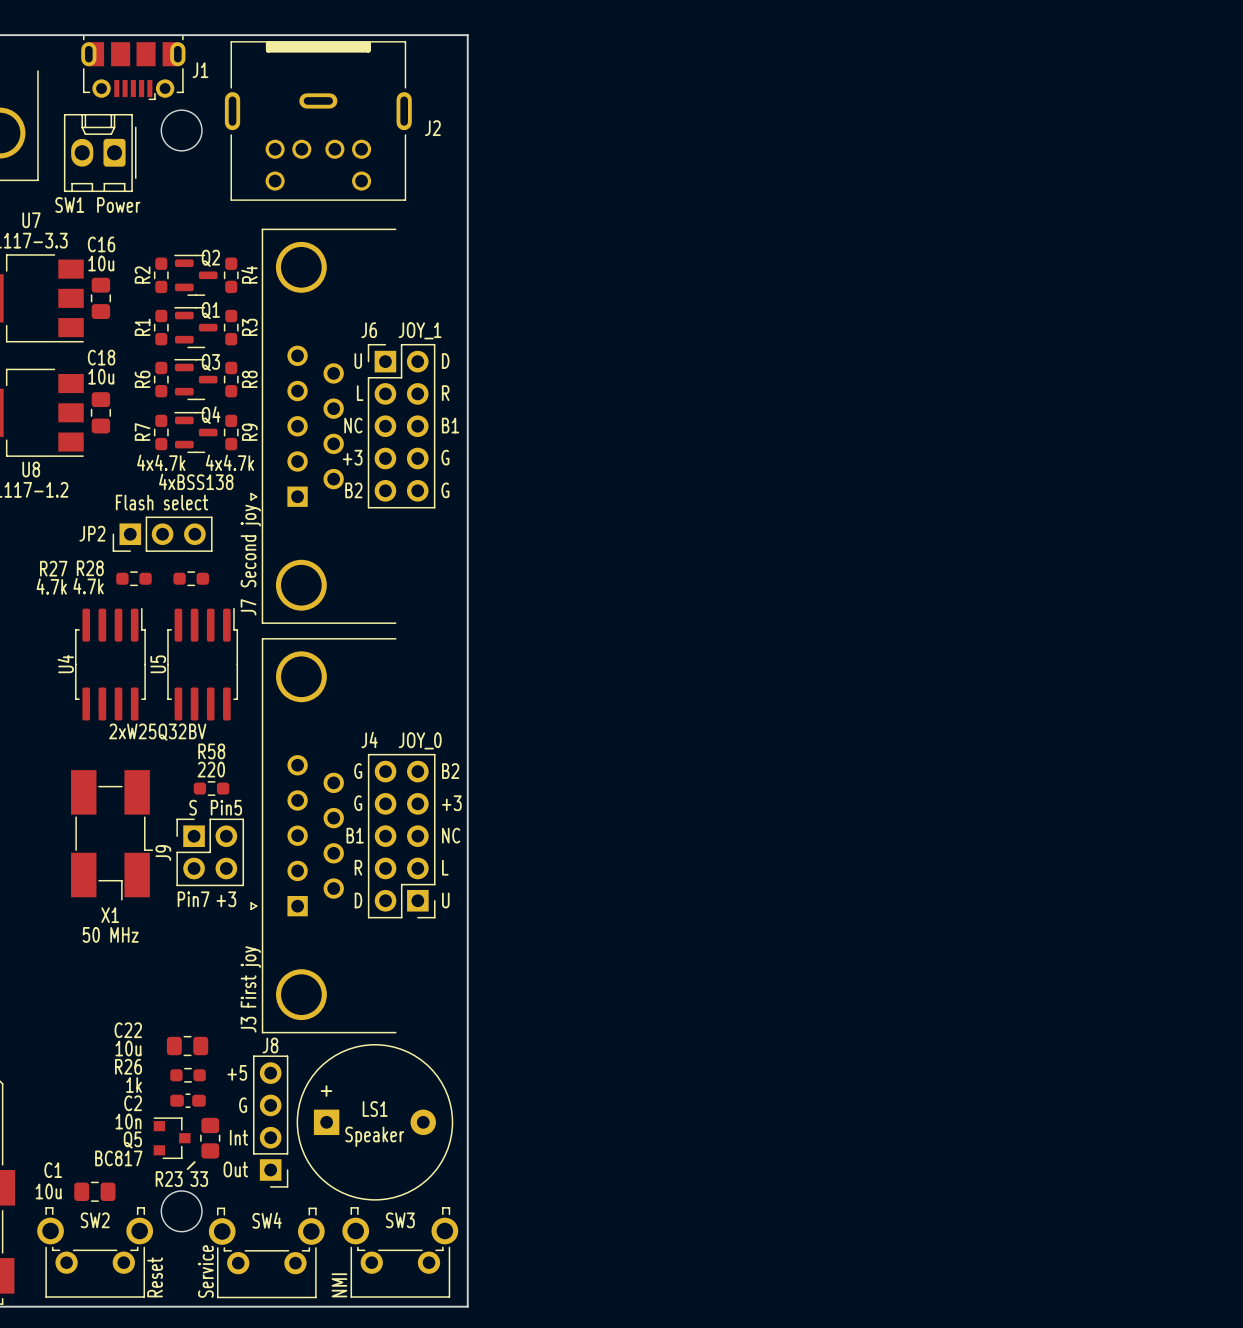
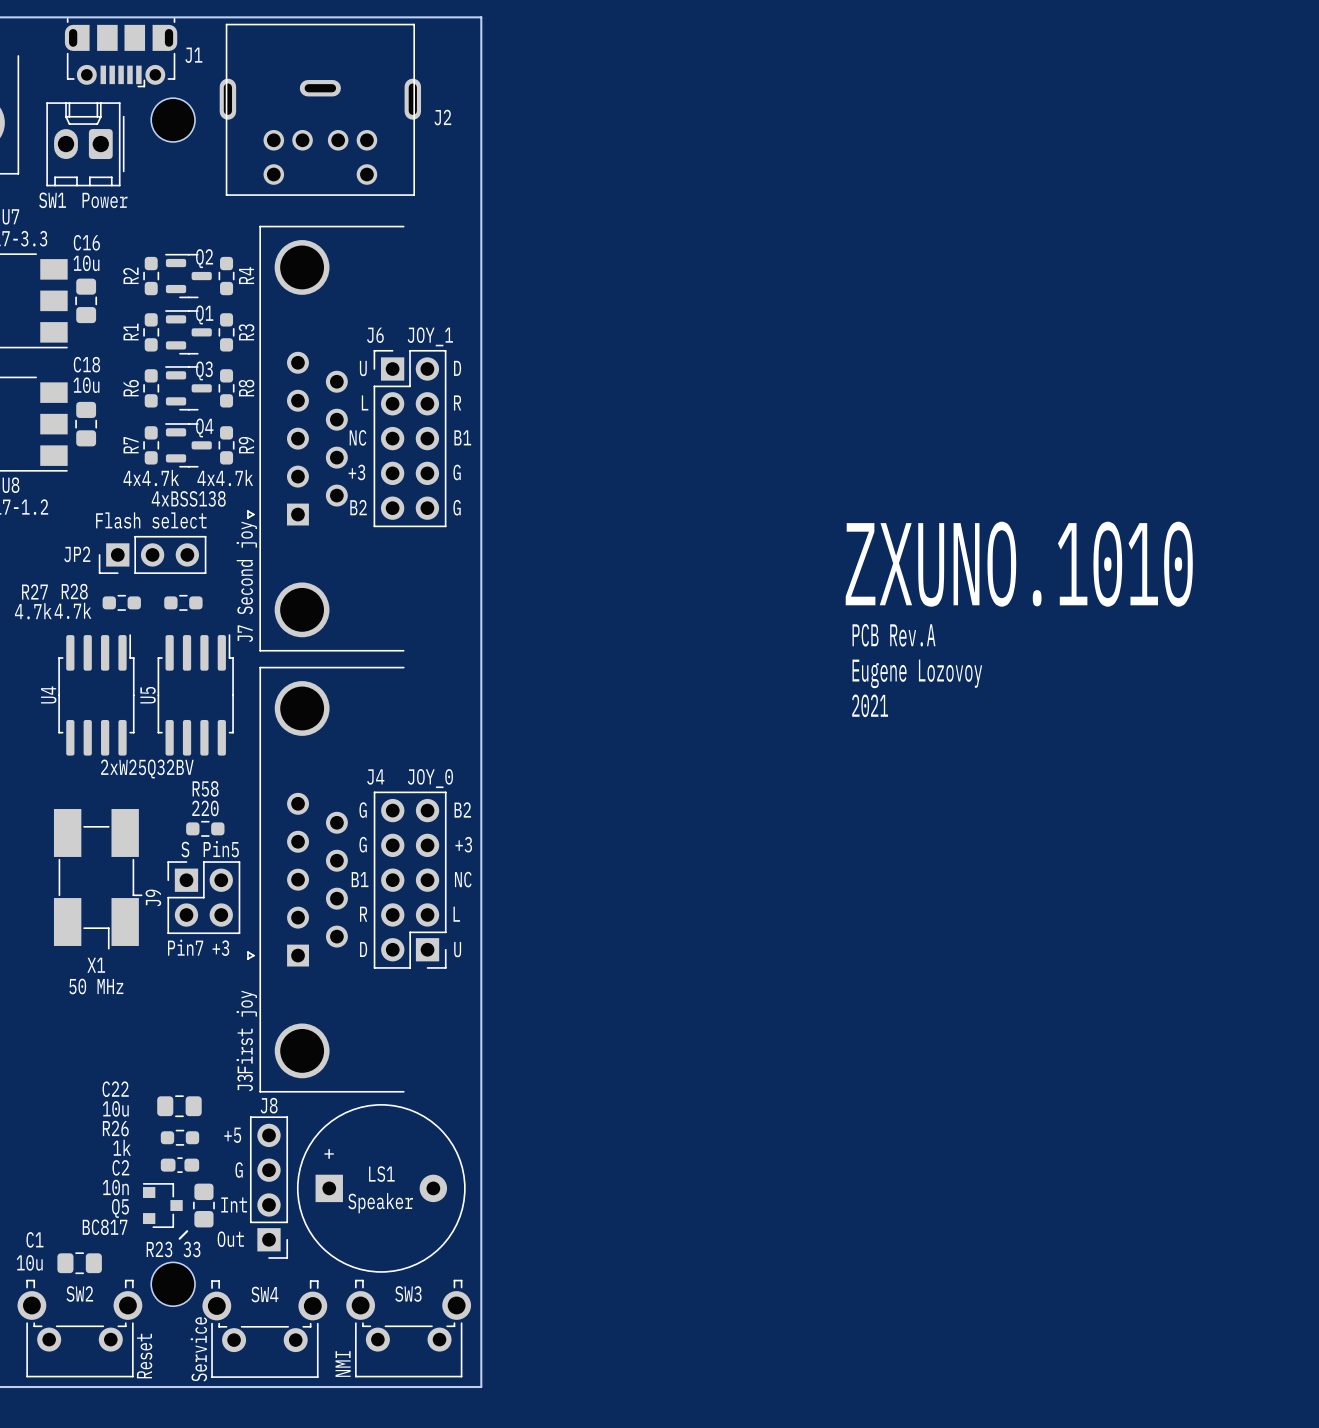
J2 footprint: [224, 41, 412, 201] -> [219, 23, 422, 196]
text: none -> ZXUNO.1010 (1019, 564)
text: none -> PCB Rev.A (893, 635)
text: none -> Eugene Lozovoy (917, 673)
text: none -> 2021 (870, 705)

